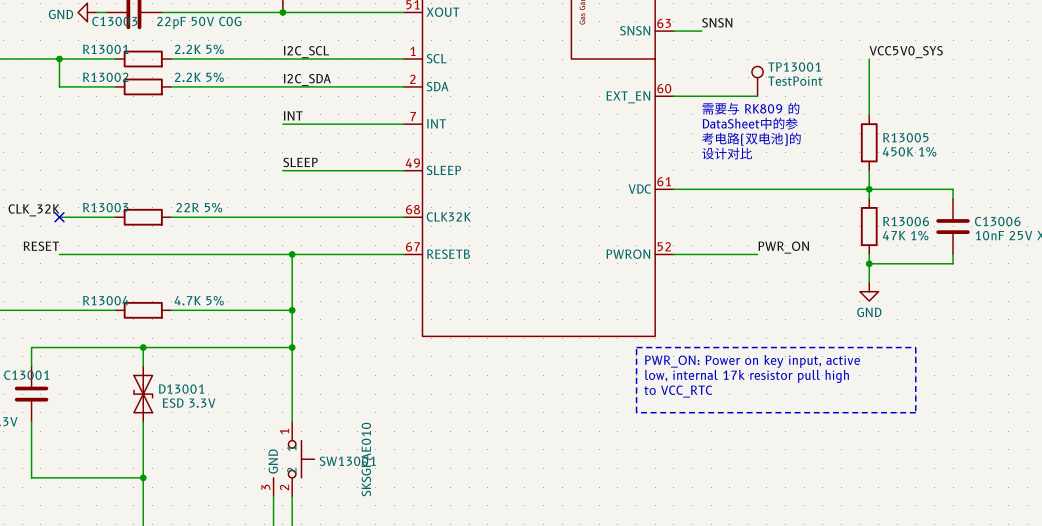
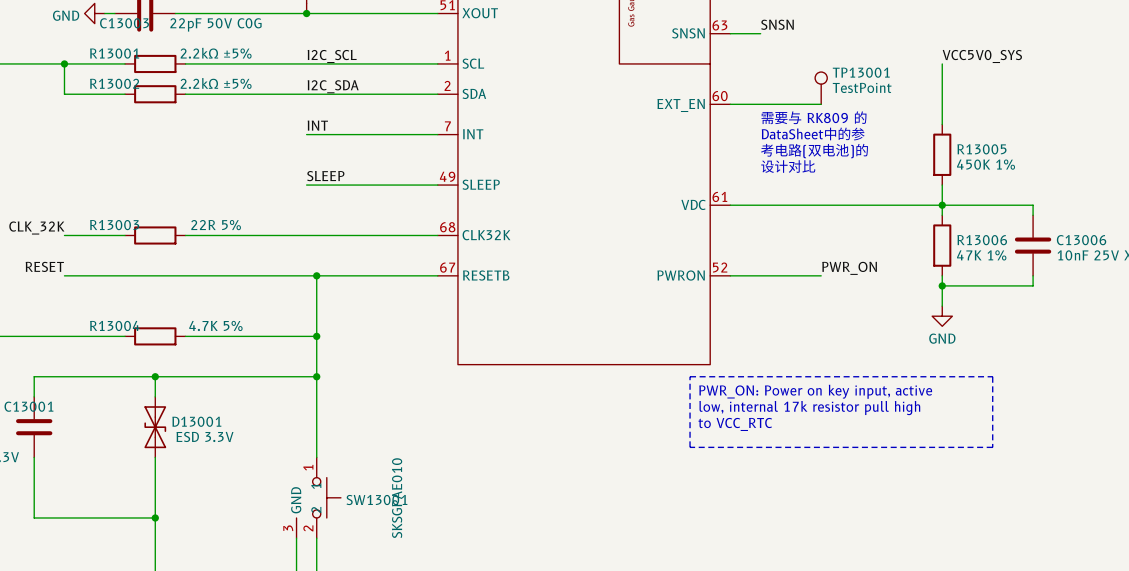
R13001 value: 2.2K 5% (199, 49) -> 2.2kΩ ±5% (216, 53)
R13002 value: 2.2K 5% (199, 77) -> 2.2kΩ ±5% (216, 83)
no-connect mark: (59, 217) -> none

